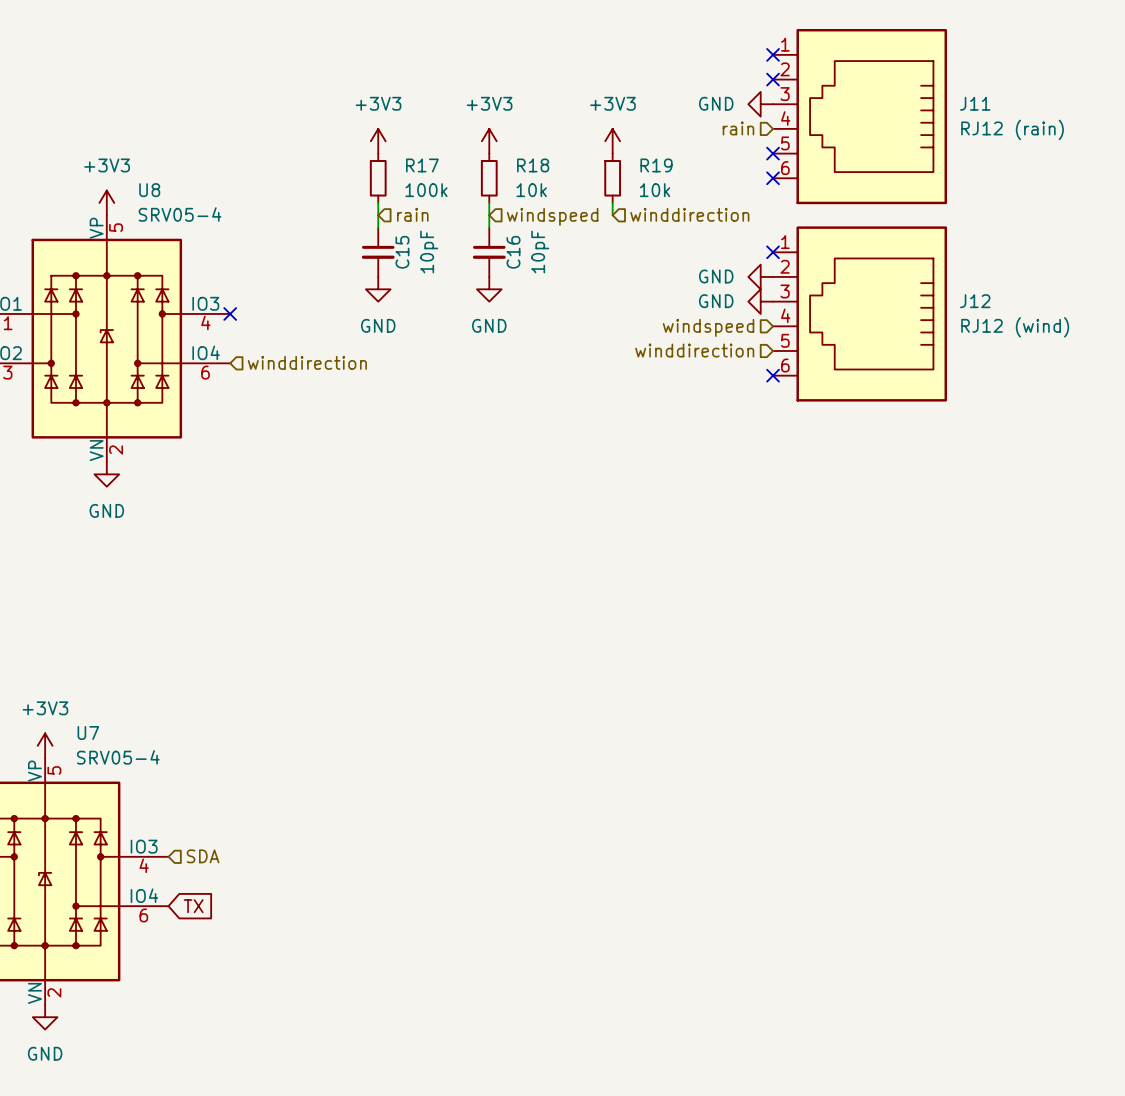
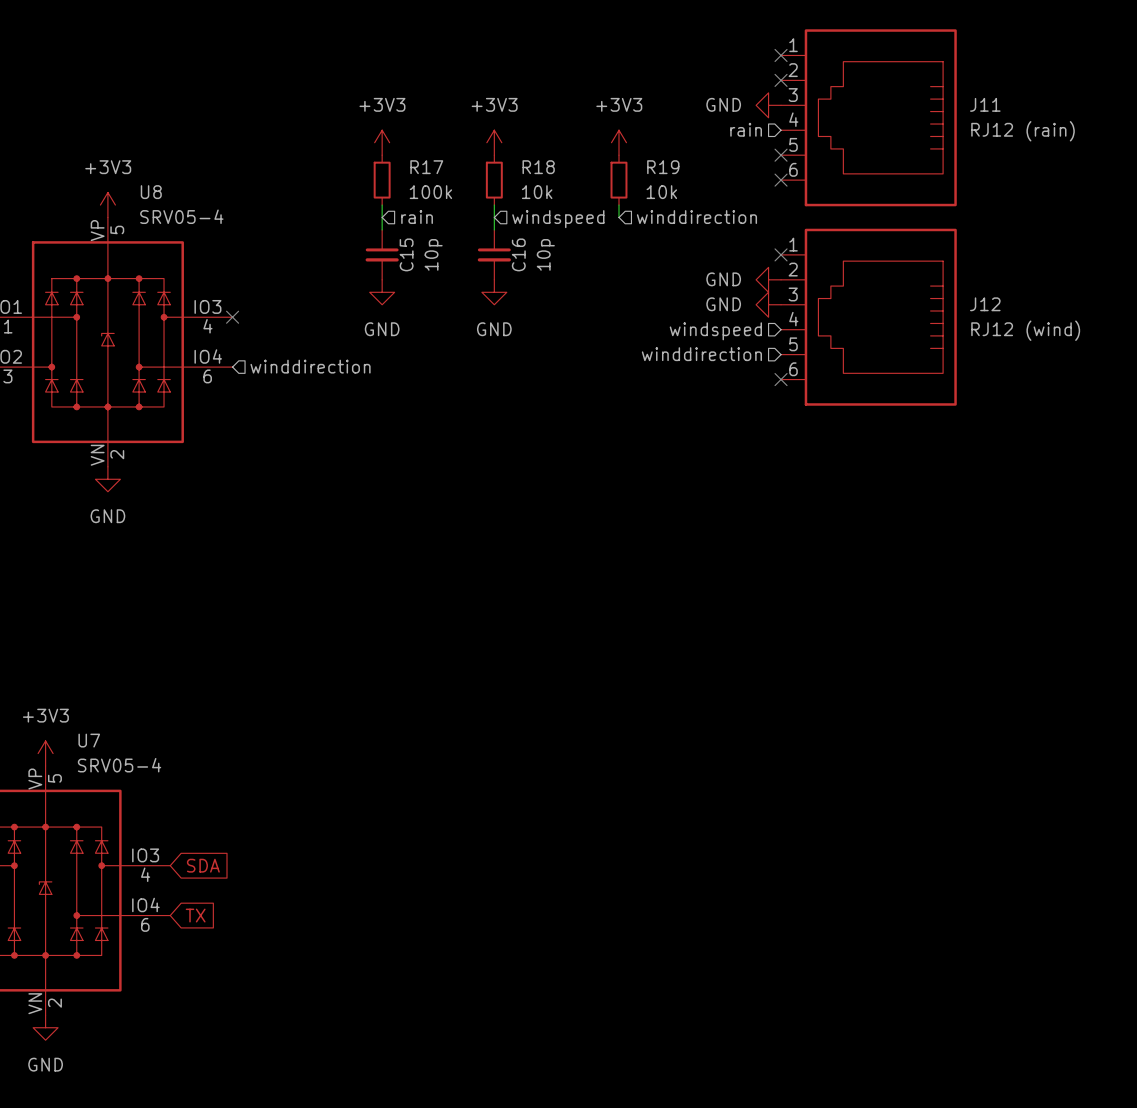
C15 value: 10pF (429, 252) -> 10p (433, 254)
C16 value: 10pF (540, 252) -> 10p (545, 254)
global label: none -> SDA (203, 865)
hierarchical label: SDA (203, 856) -> none

